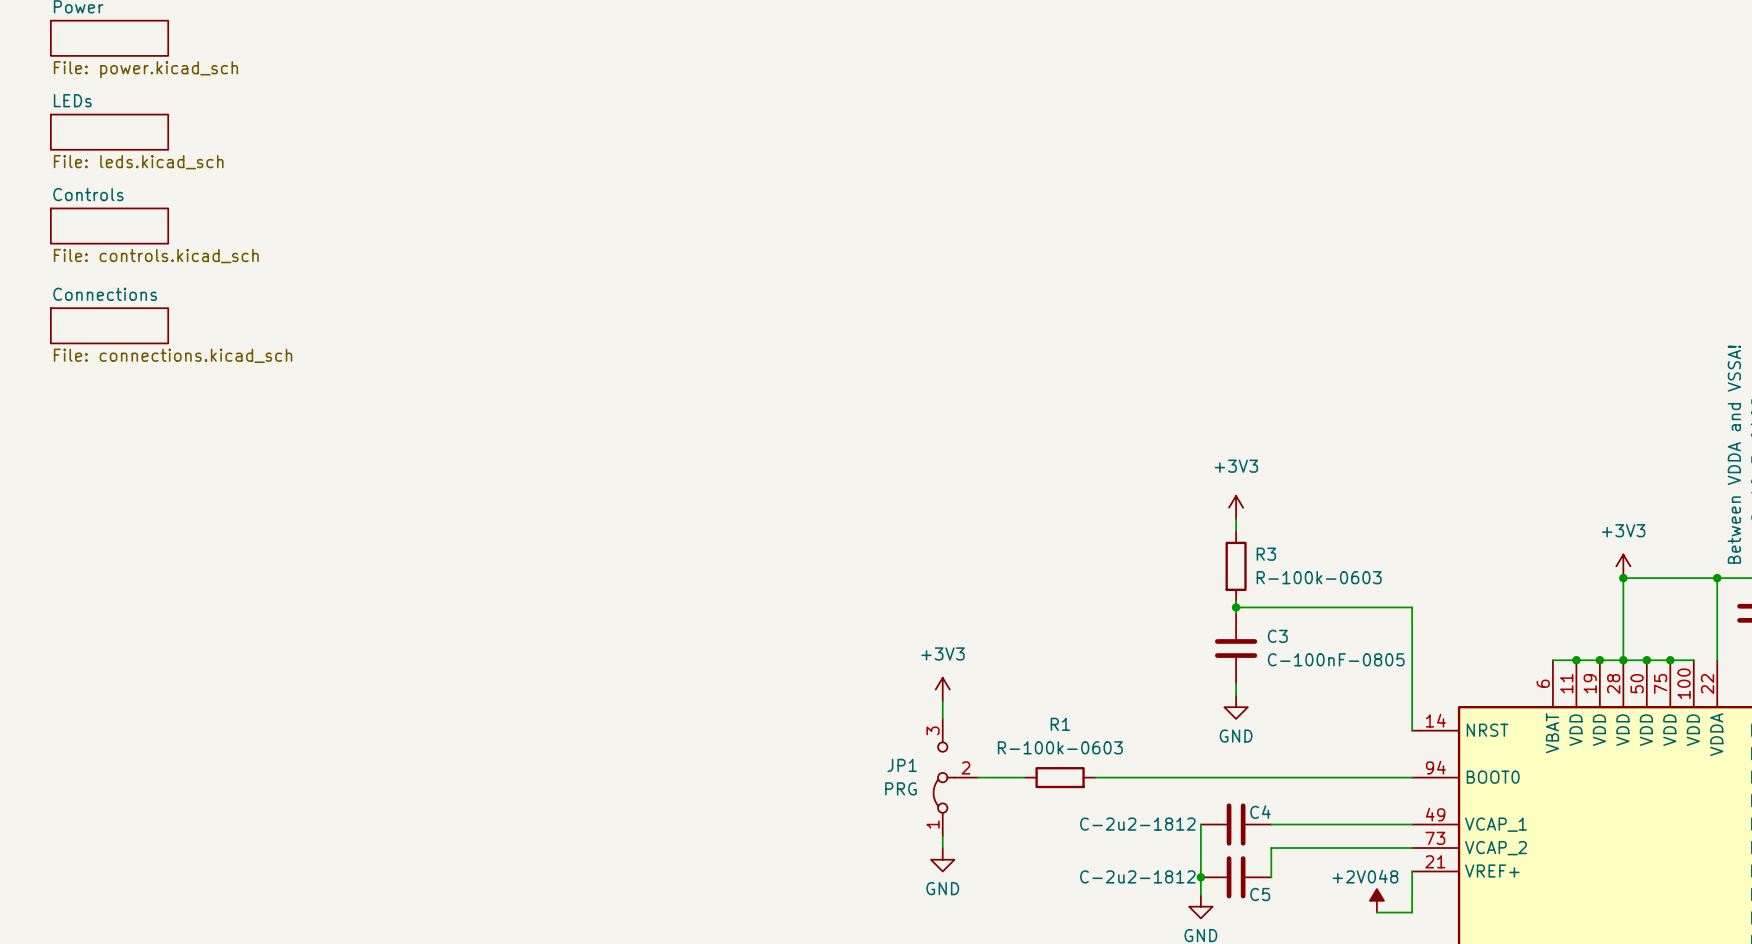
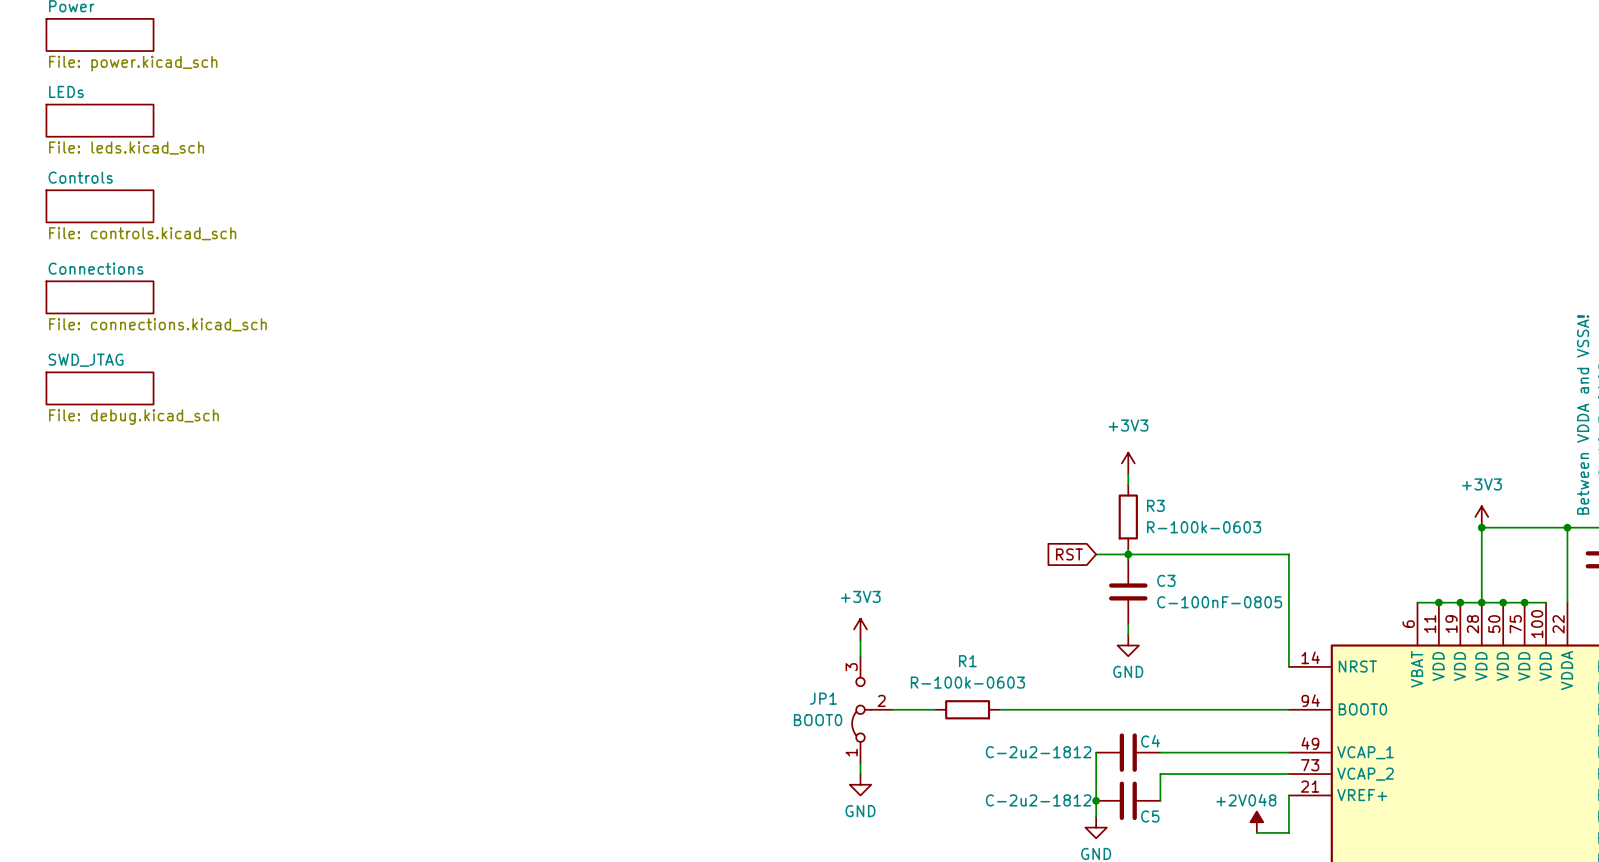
sheet SWD_JTAG: none -> File: debug.kicad_sch (99, 388)
global label: none -> RST (1069, 554)
wire: none -> (1096, 554) (1128, 554)
JP1 value: PRG (901, 788) -> BOOT0 (818, 720)

